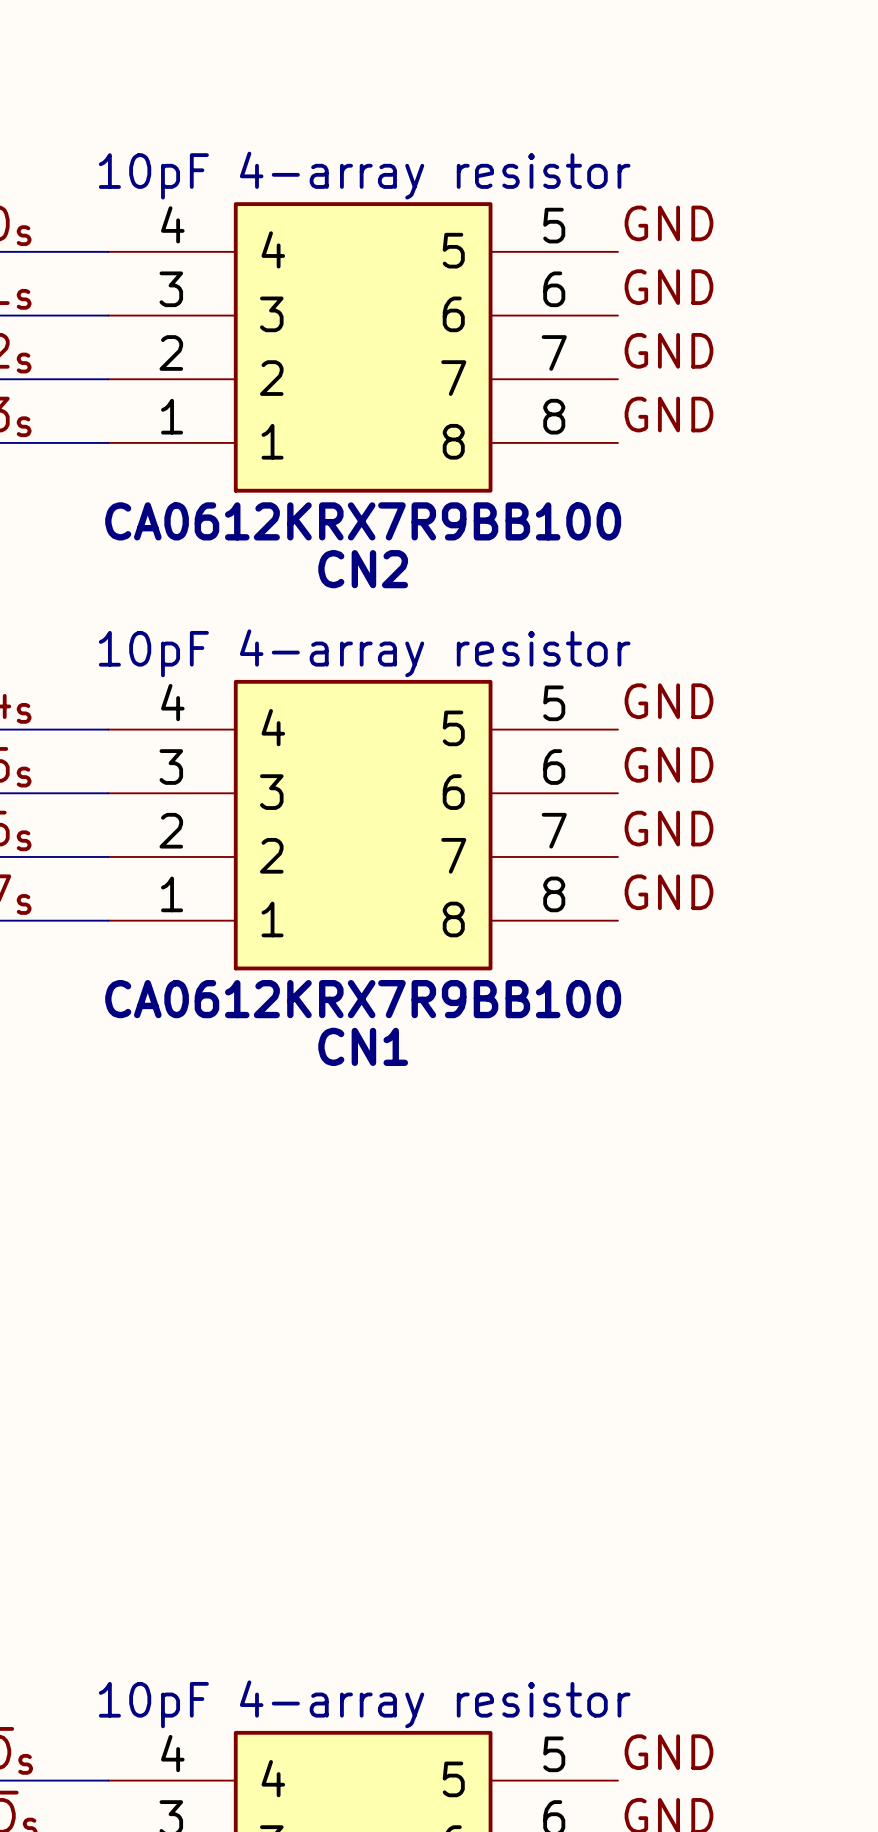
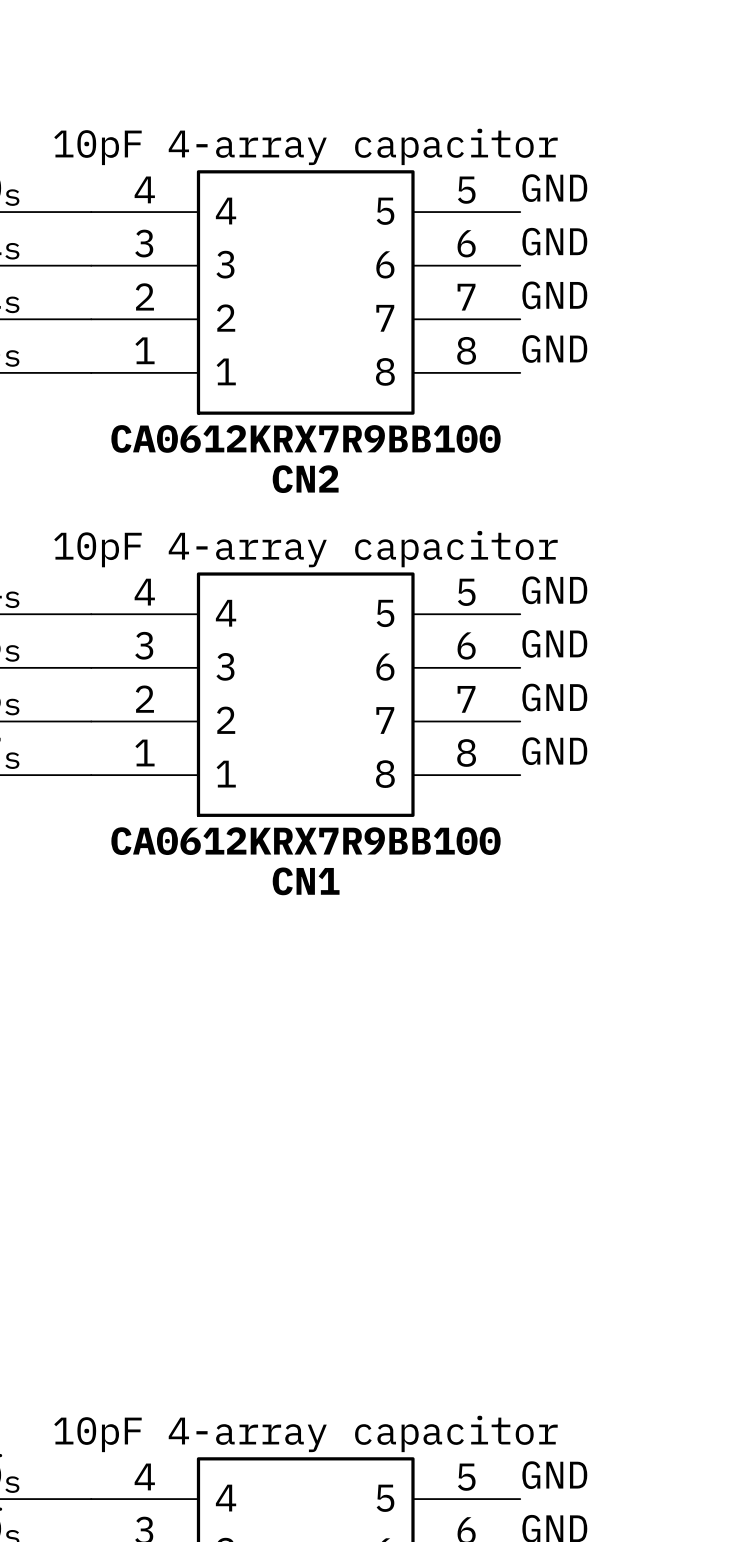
CN2 text: 10pF 4-array resistor (364, 175) -> 10pF 4-array capacitor (305, 146)
CN1 text: 10pF 4-array resistor (364, 653) -> 10pF 4-array capacitor (305, 549)
part text: 10pF 4-array resistor (364, 1704) -> 10pF 4-array capacitor (305, 1433)

